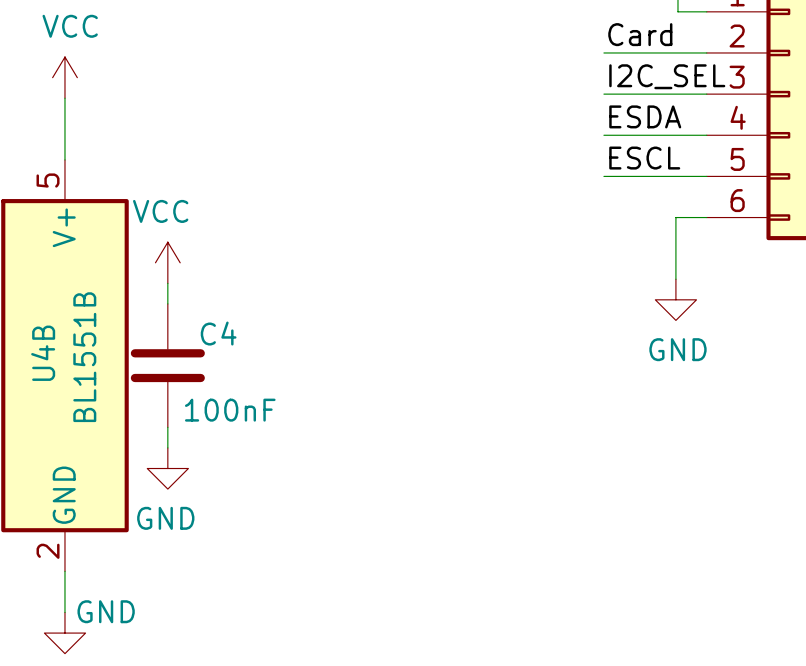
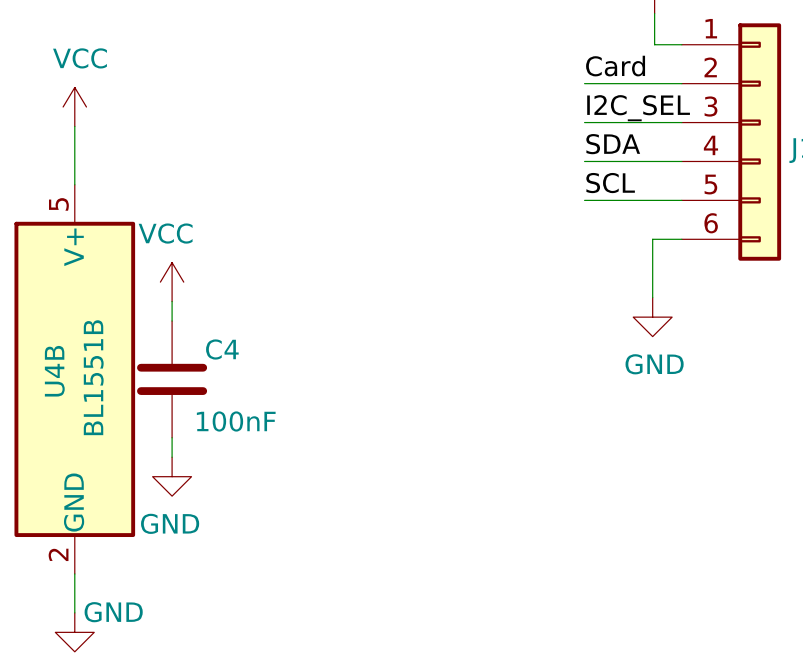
label: ESDA (645, 116) -> SDA (613, 144)
label: ESCL (644, 158) -> SCL (610, 183)

